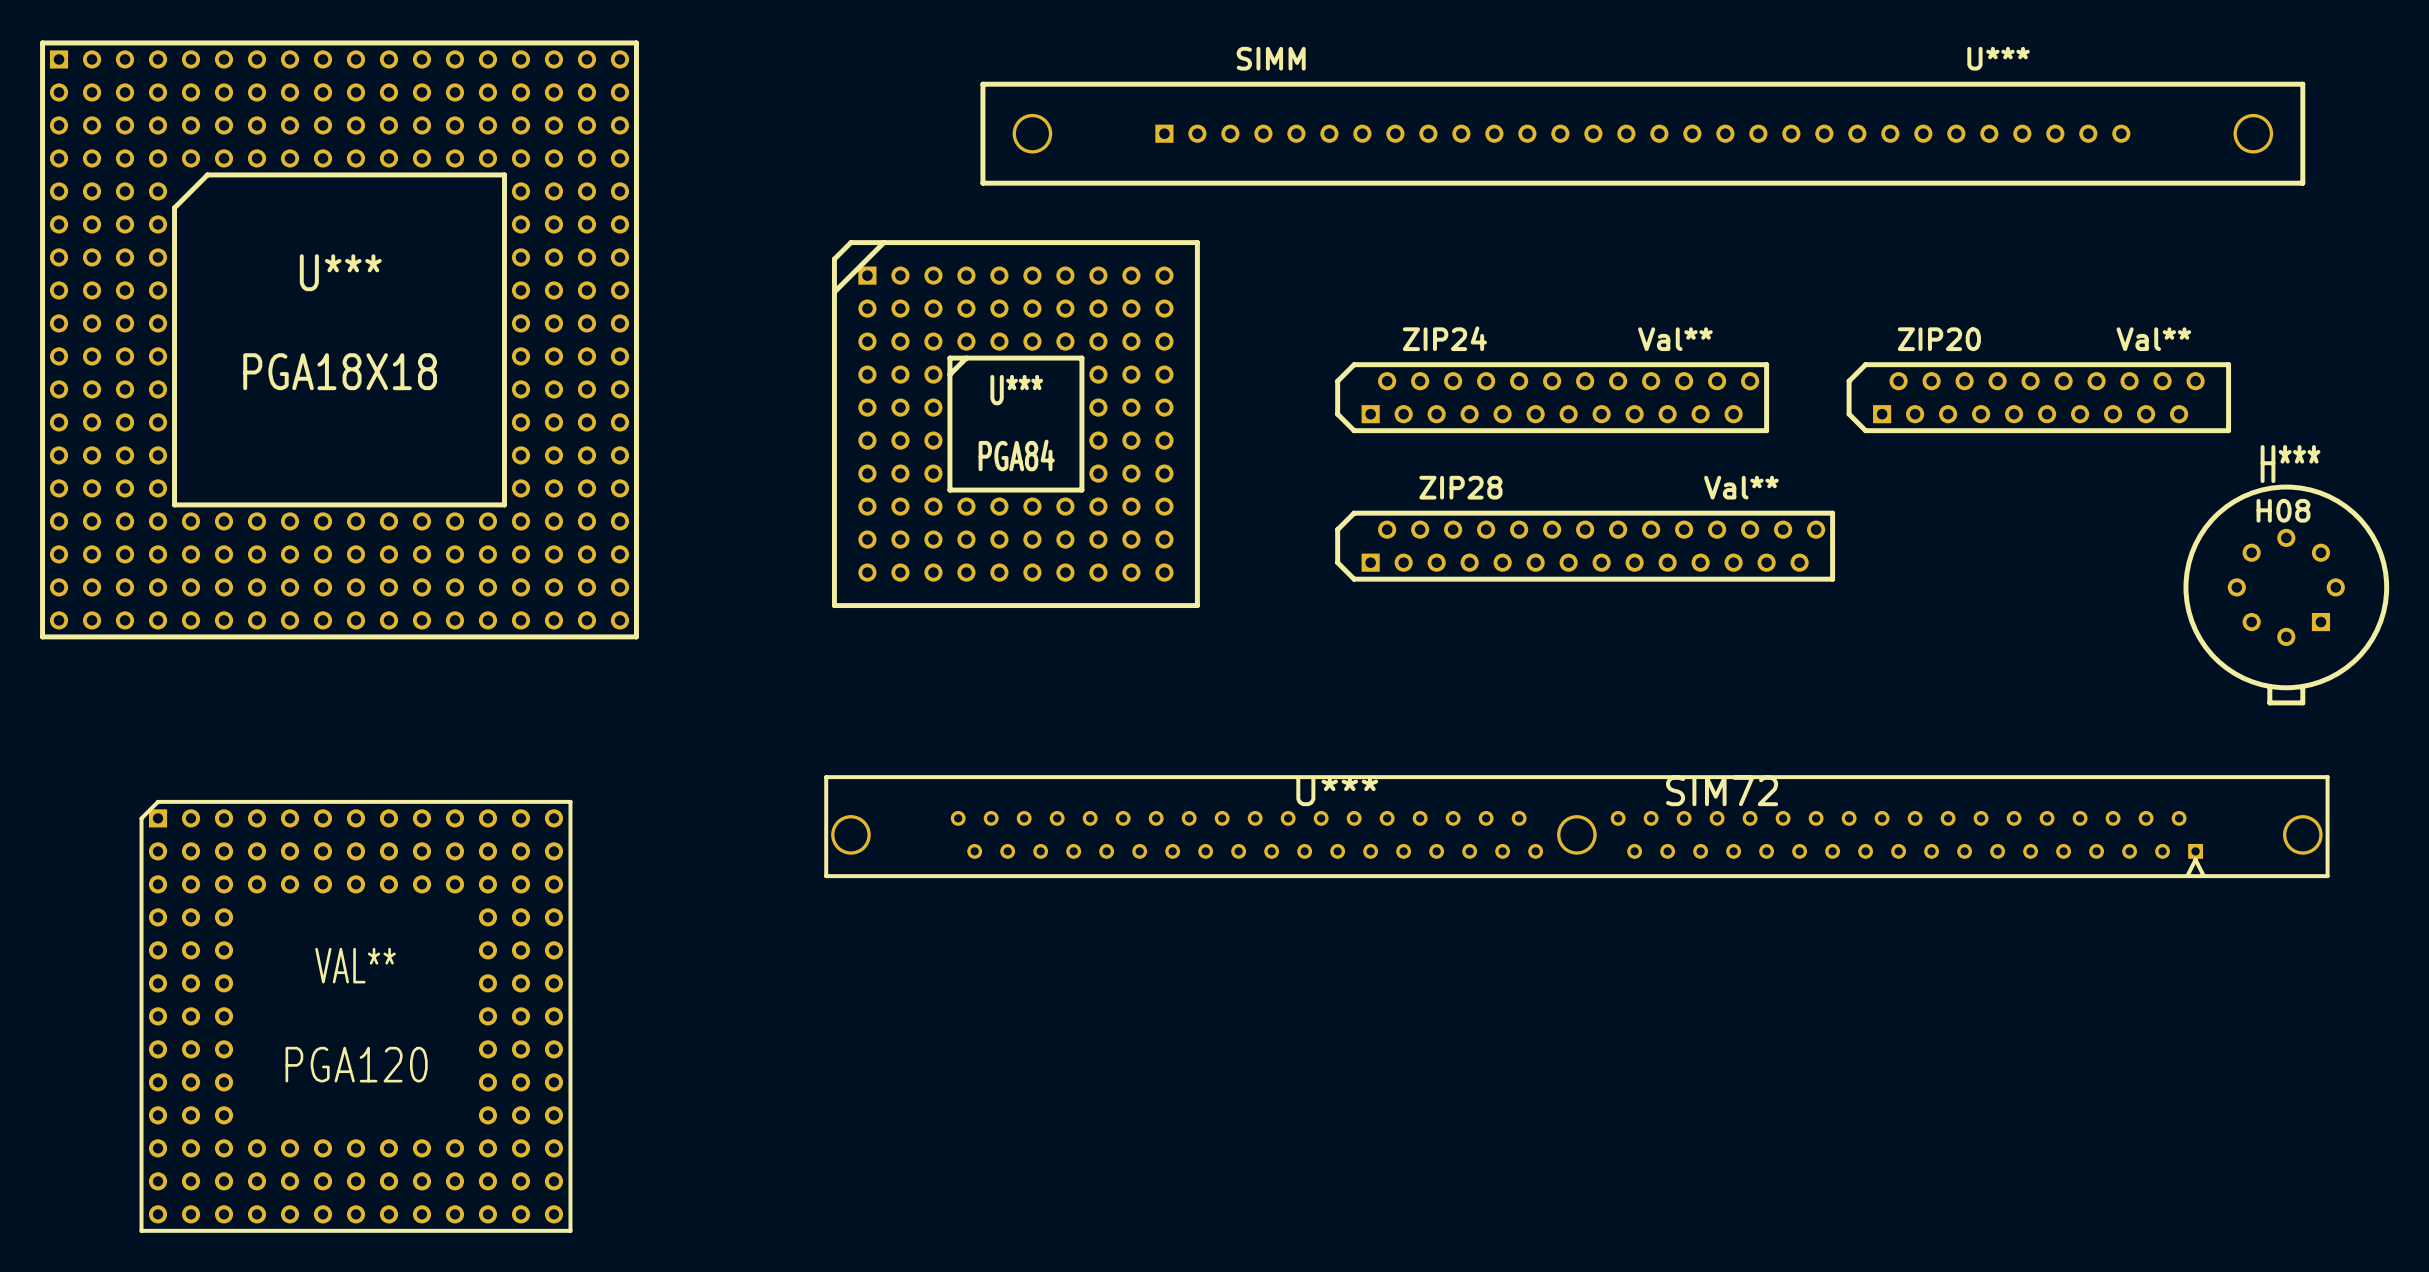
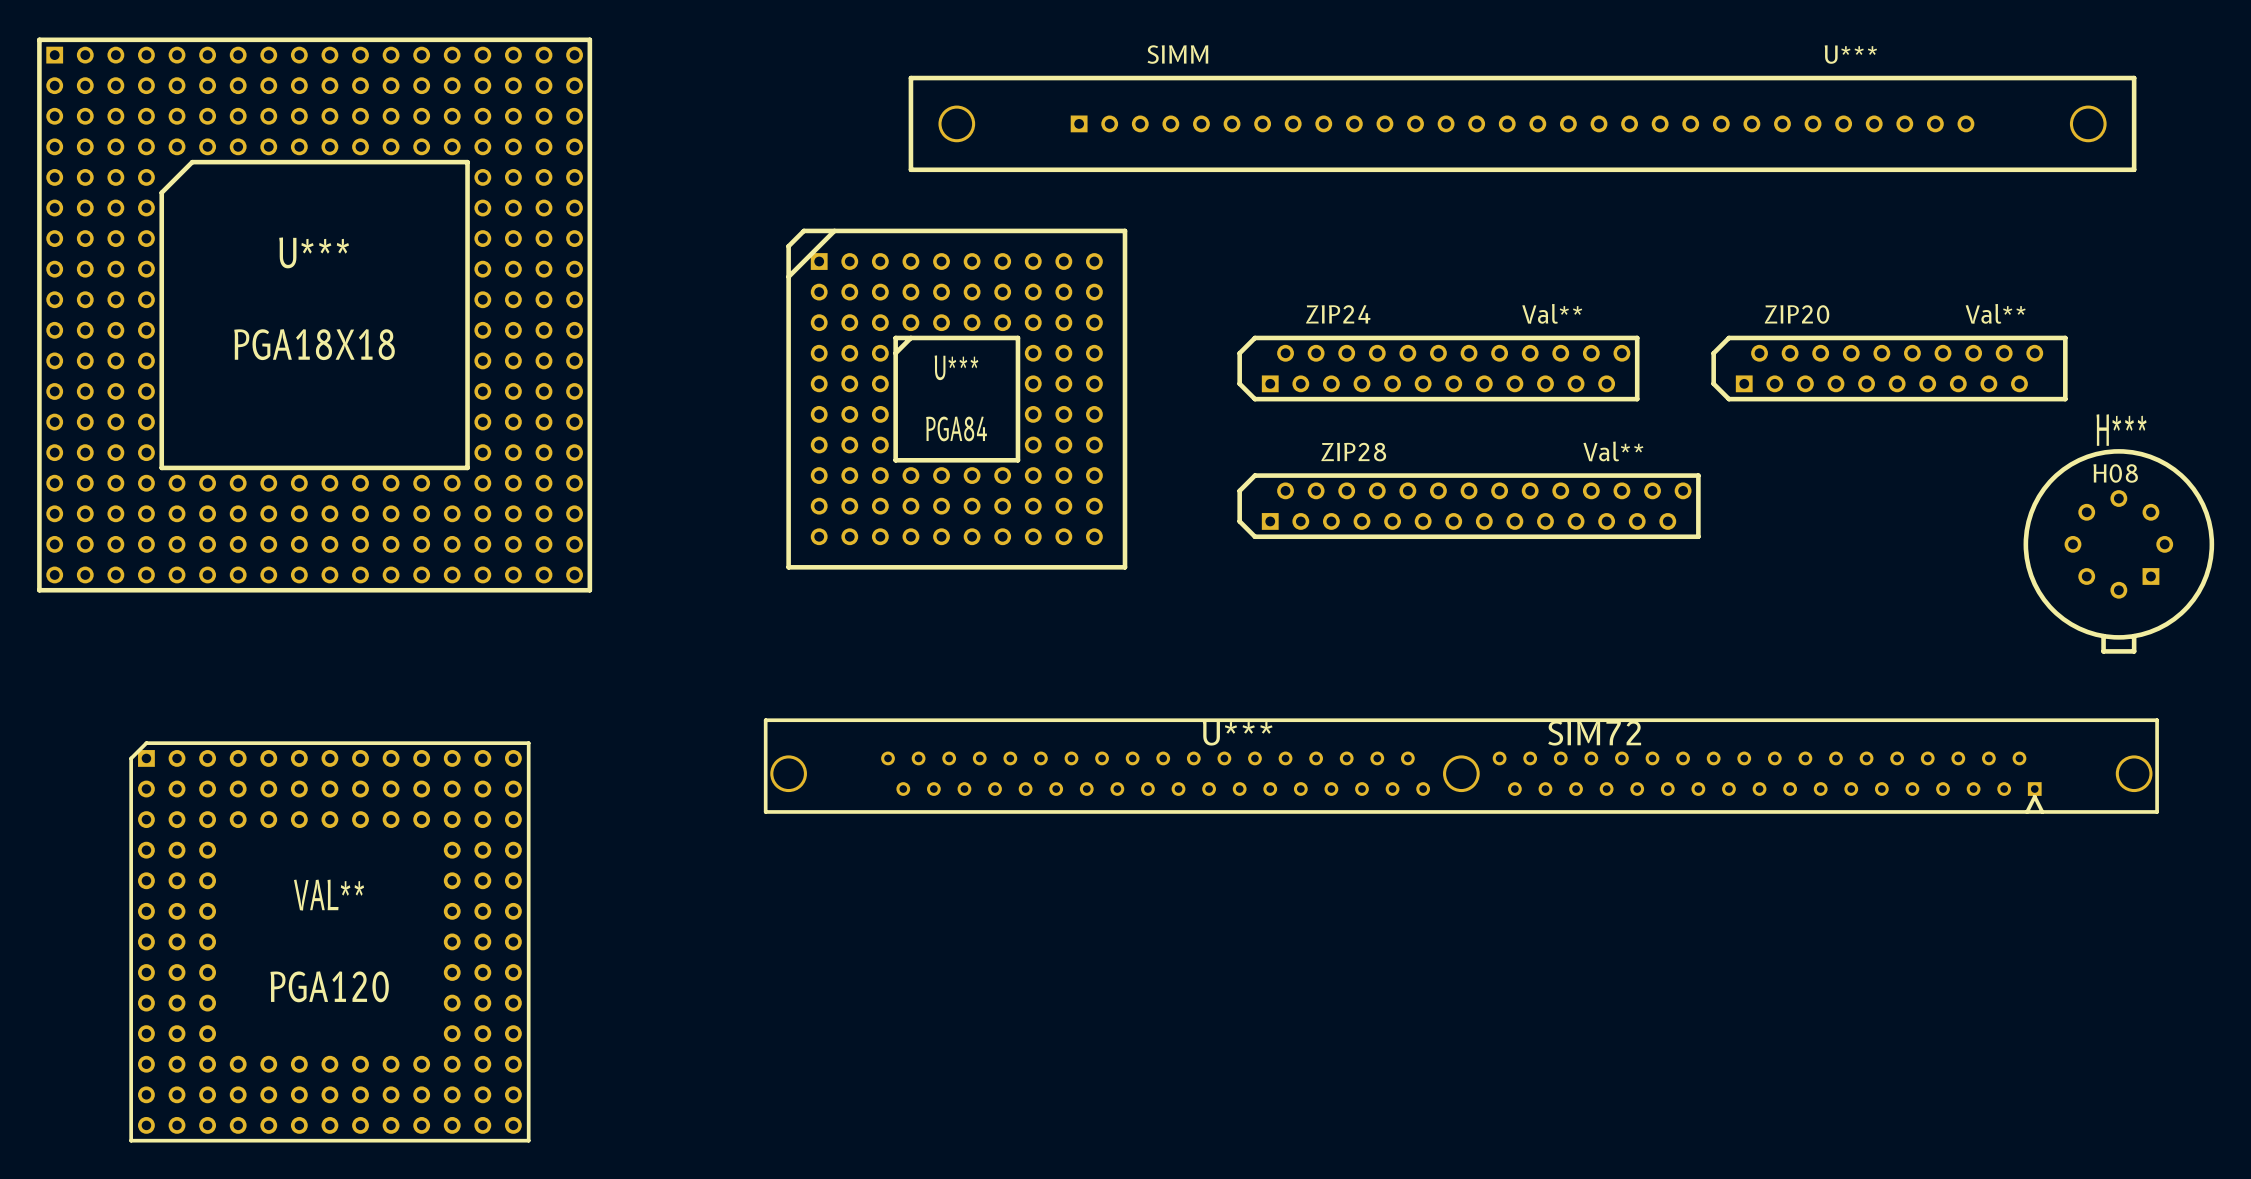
U*** position: (1015, 424) -> (956, 399)

